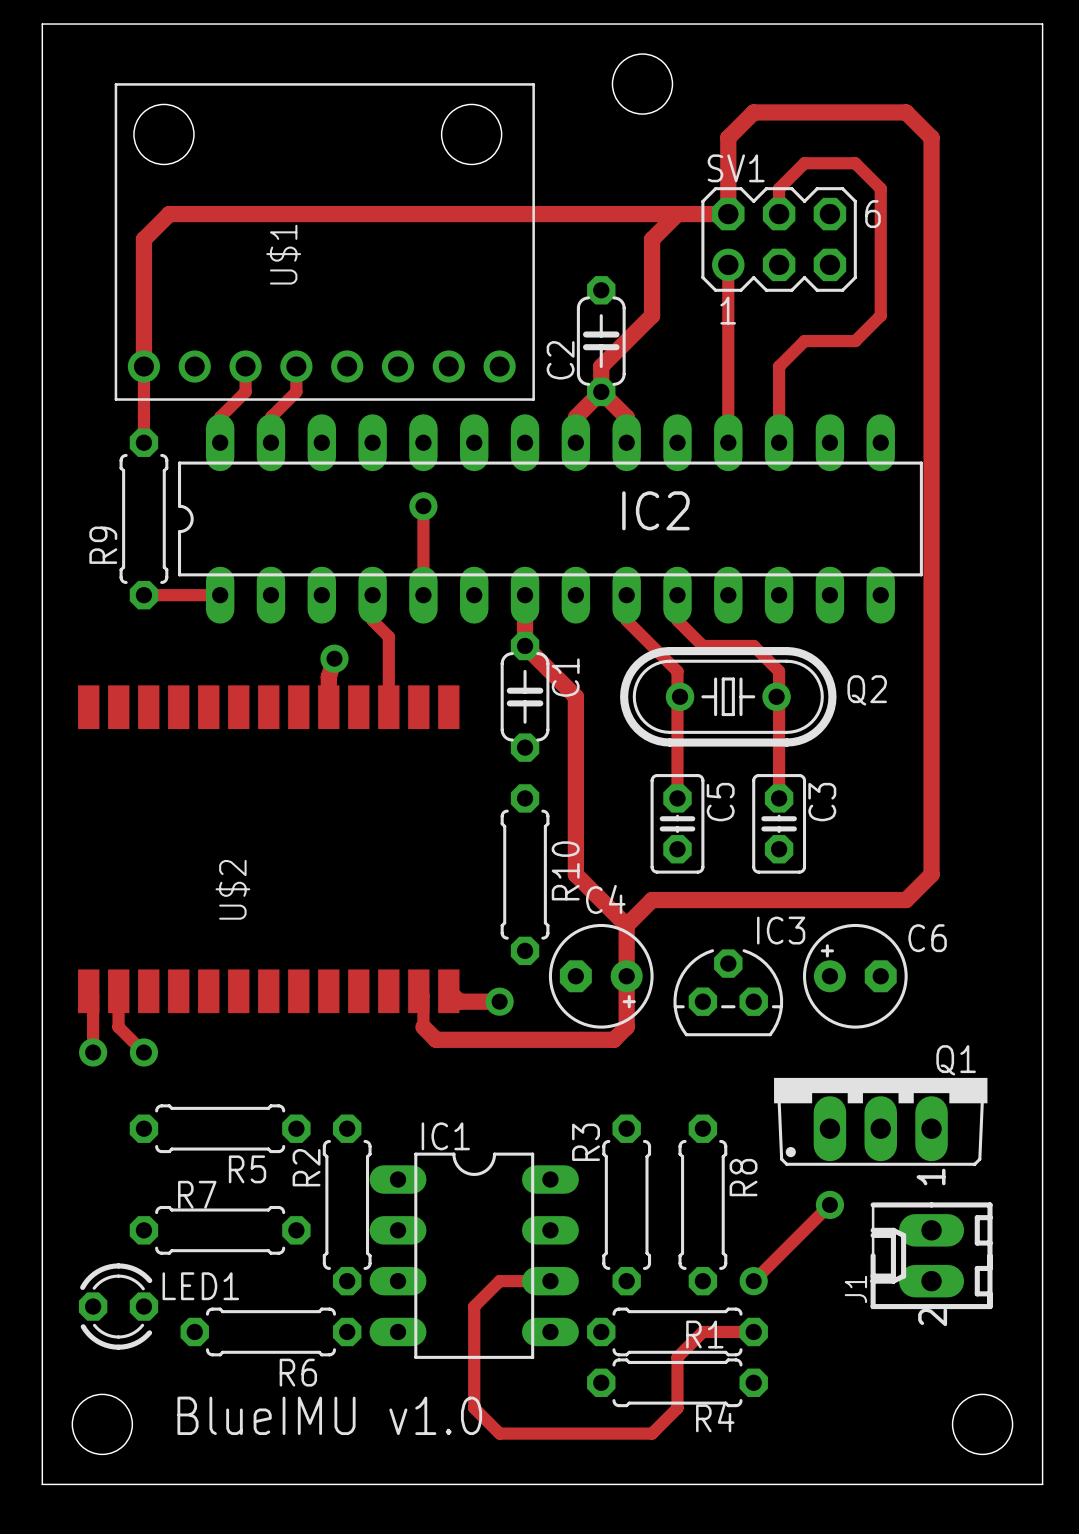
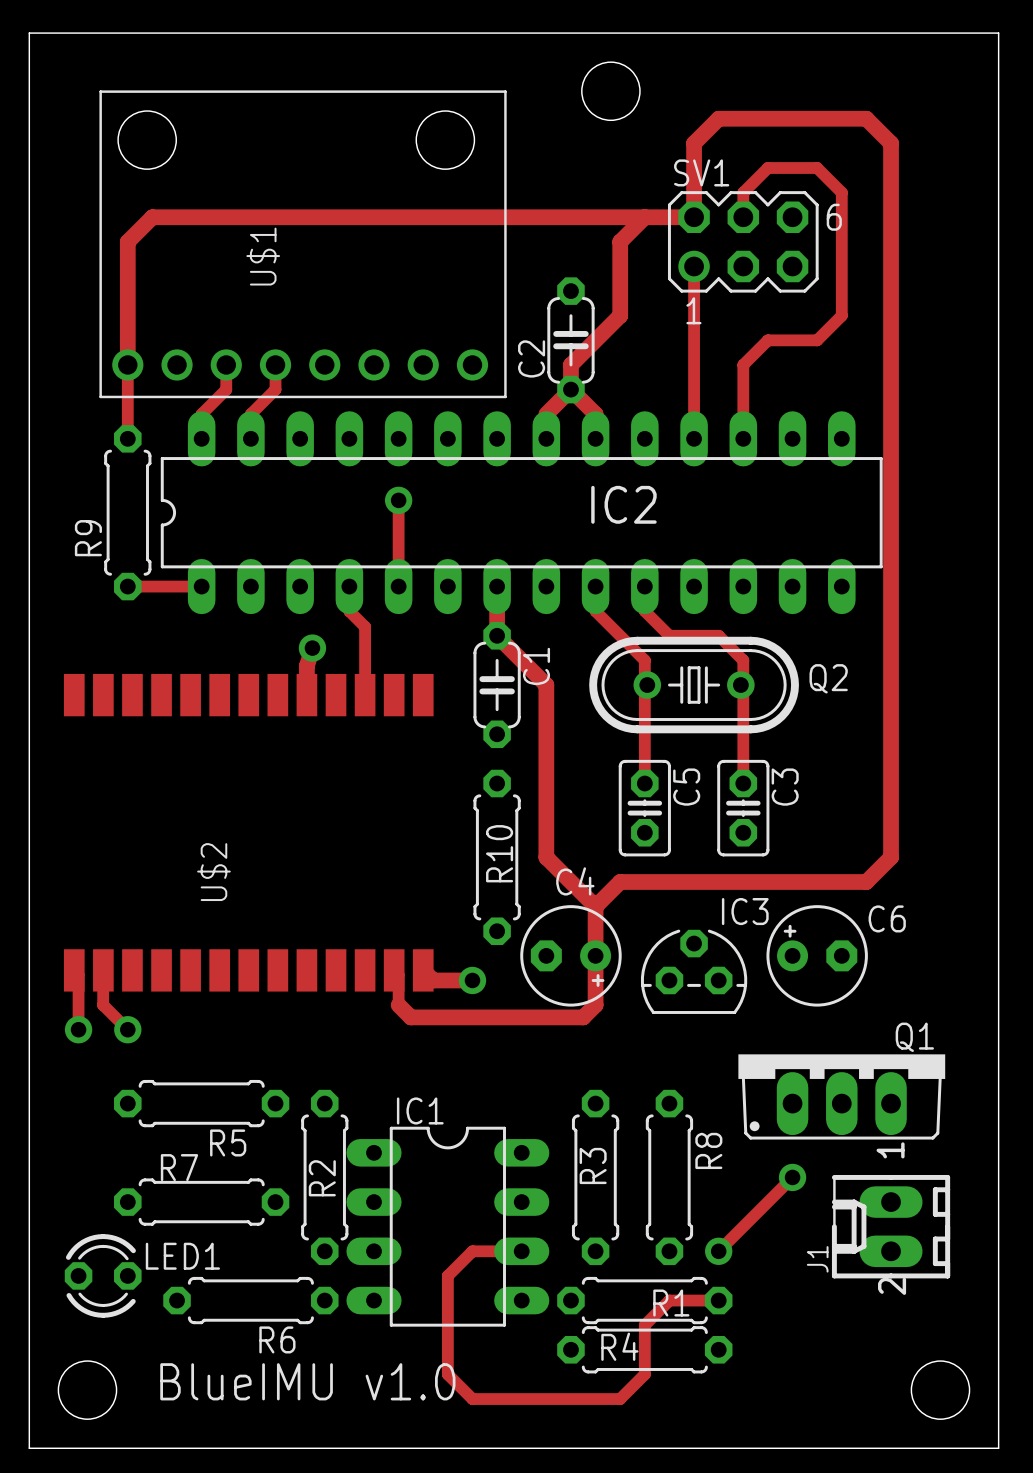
R10 name position: R10 (565, 870) -> R10 (499, 853)
R3 name position: R3 (586, 1142) -> R3 (593, 1165)
R2 name position: R2 (306, 1167) -> R2 (322, 1178)
R4 name position: R4 (715, 1417) -> R4 (619, 1346)

